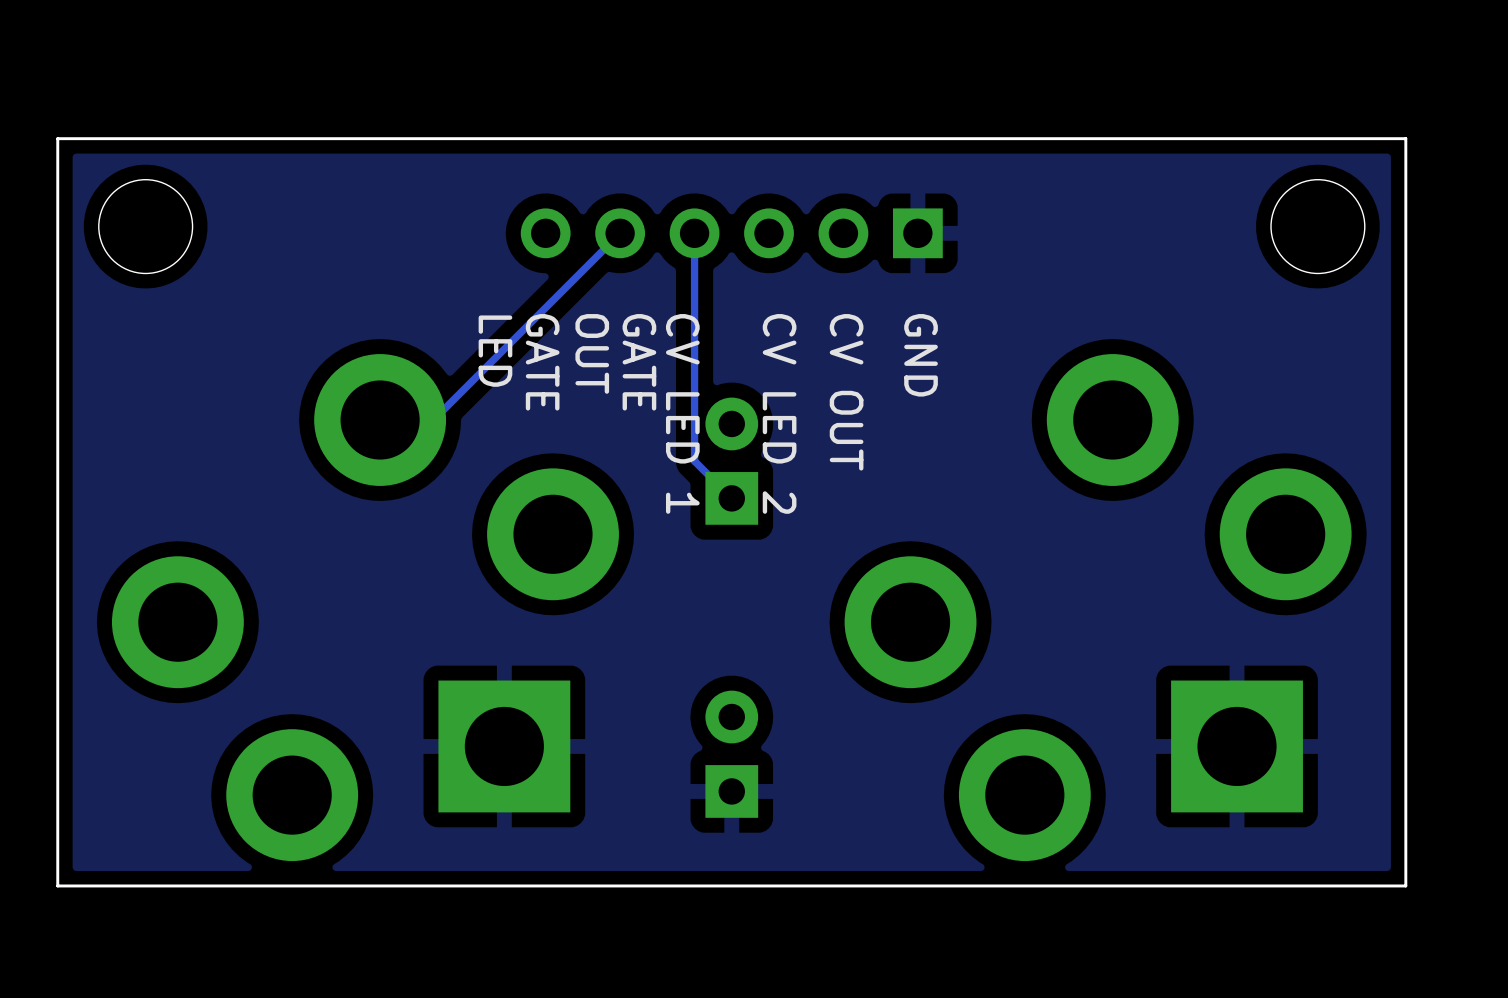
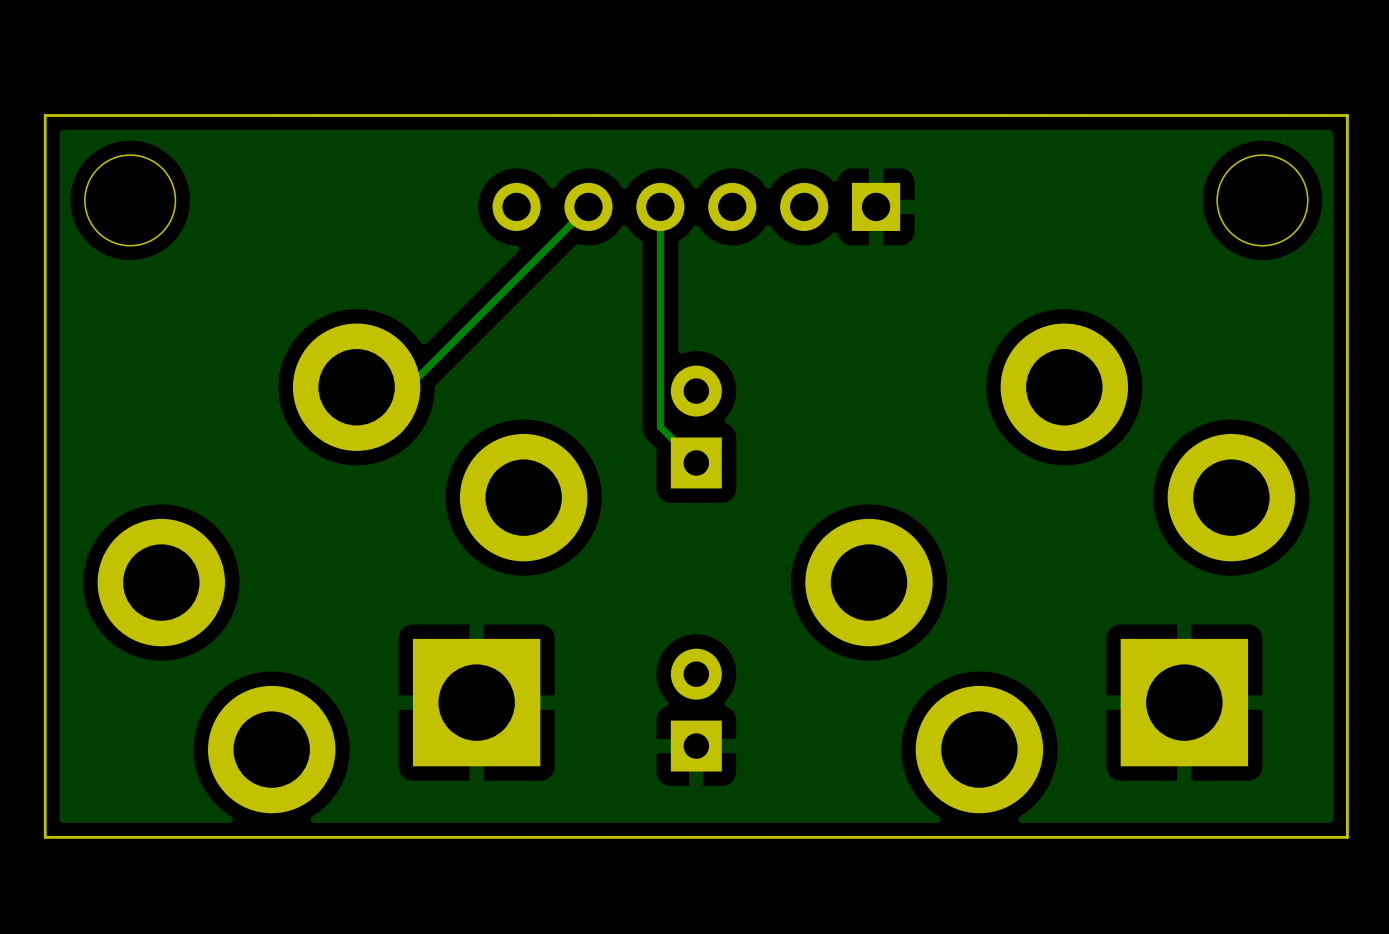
text: LED (495, 351) -> none
text: OUT (592, 353) -> none
text: GND (921, 355) -> none
text: GATE (542, 362) -> none
text: GATE (639, 362) -> none
text: CV OUT (846, 392) -> none
text: CV LED 1 (682, 413) -> none
text: CV LED 2 (779, 413) -> none

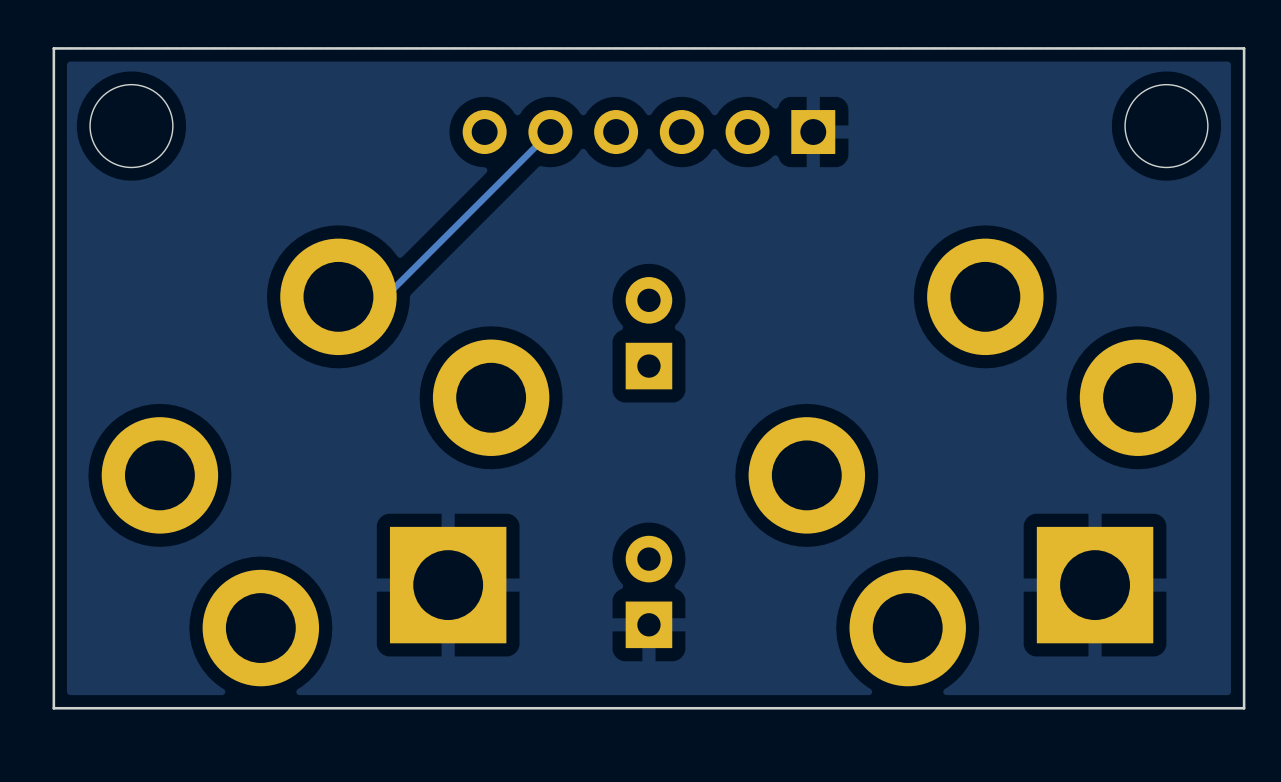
track: (660, 206) (660, 427) (696, 462) -> none

